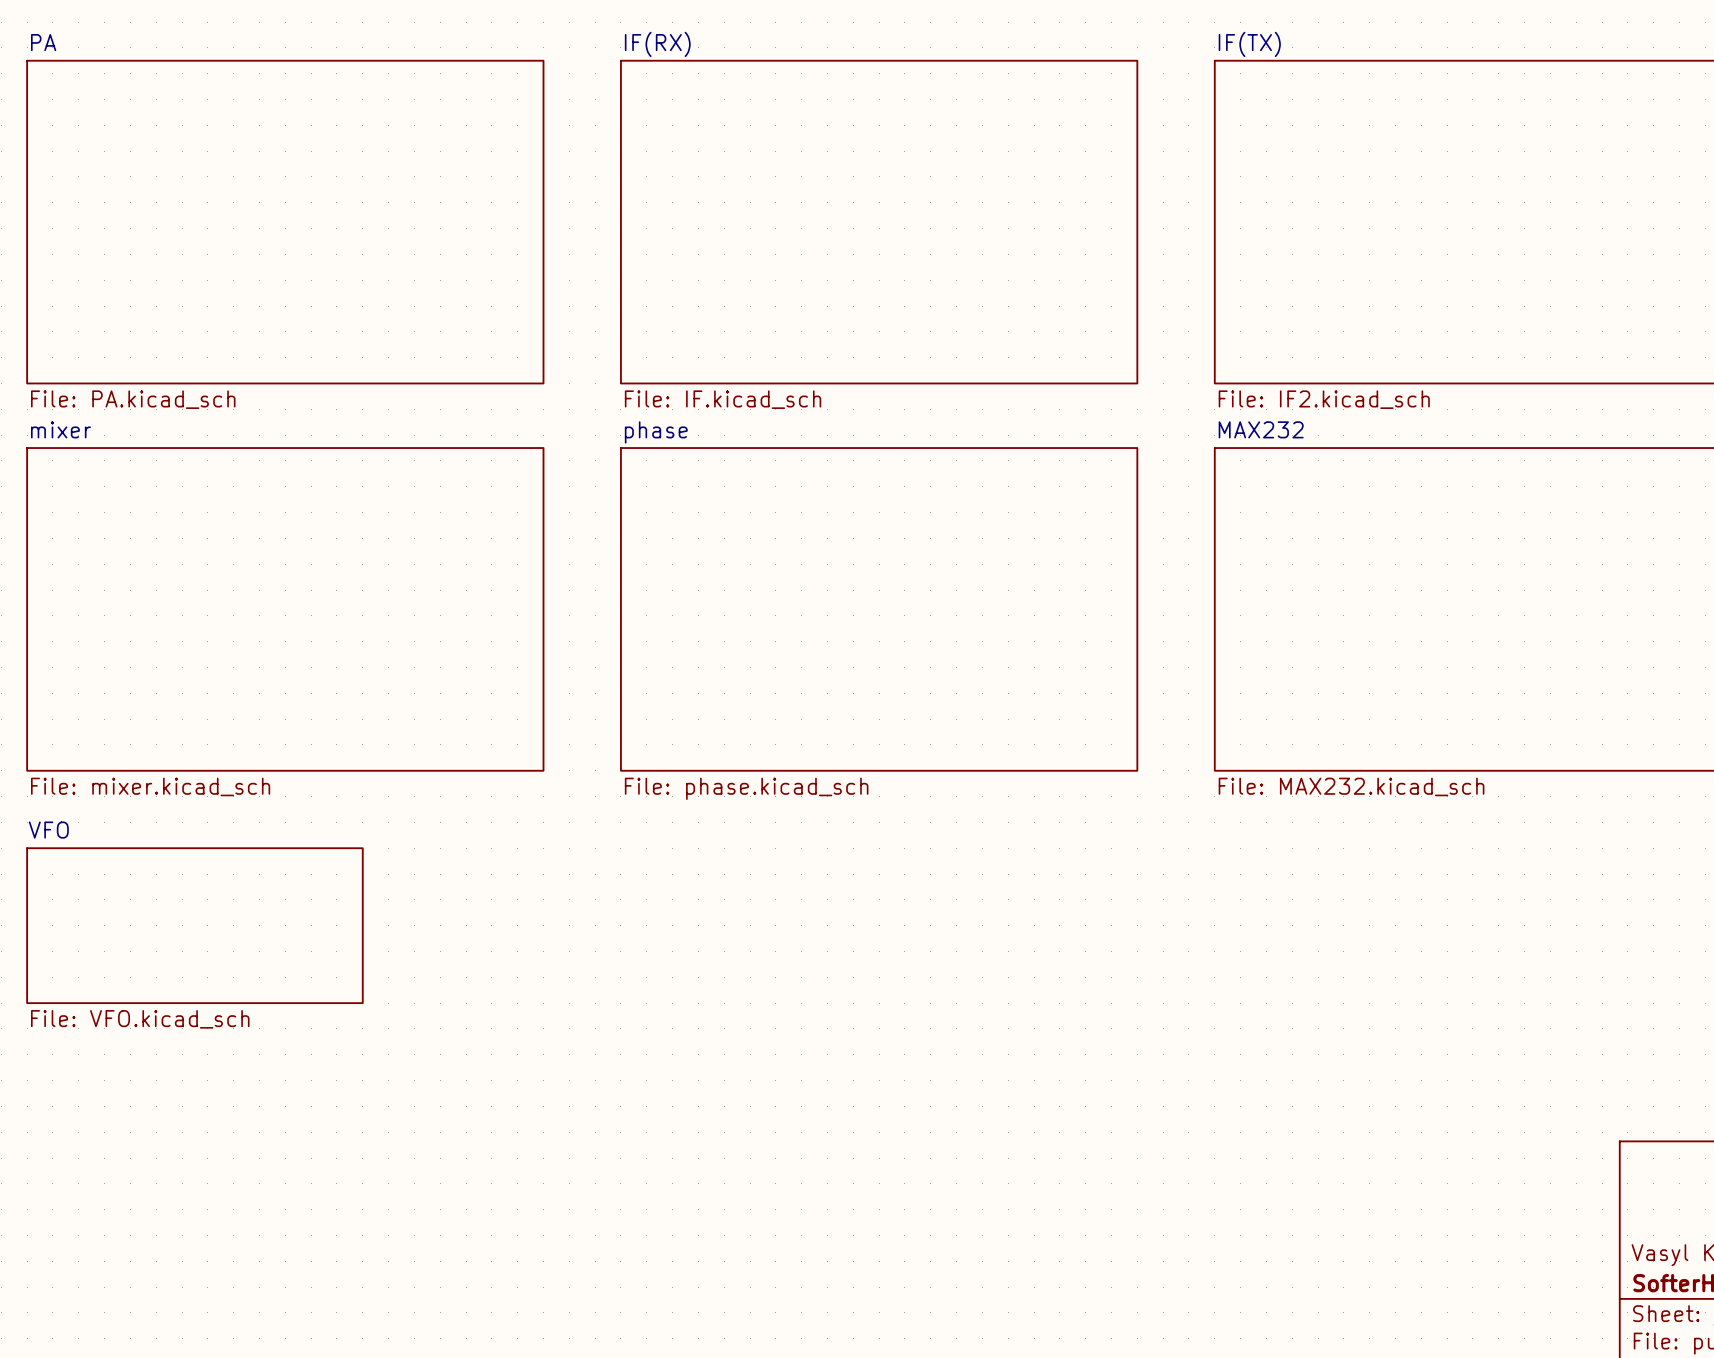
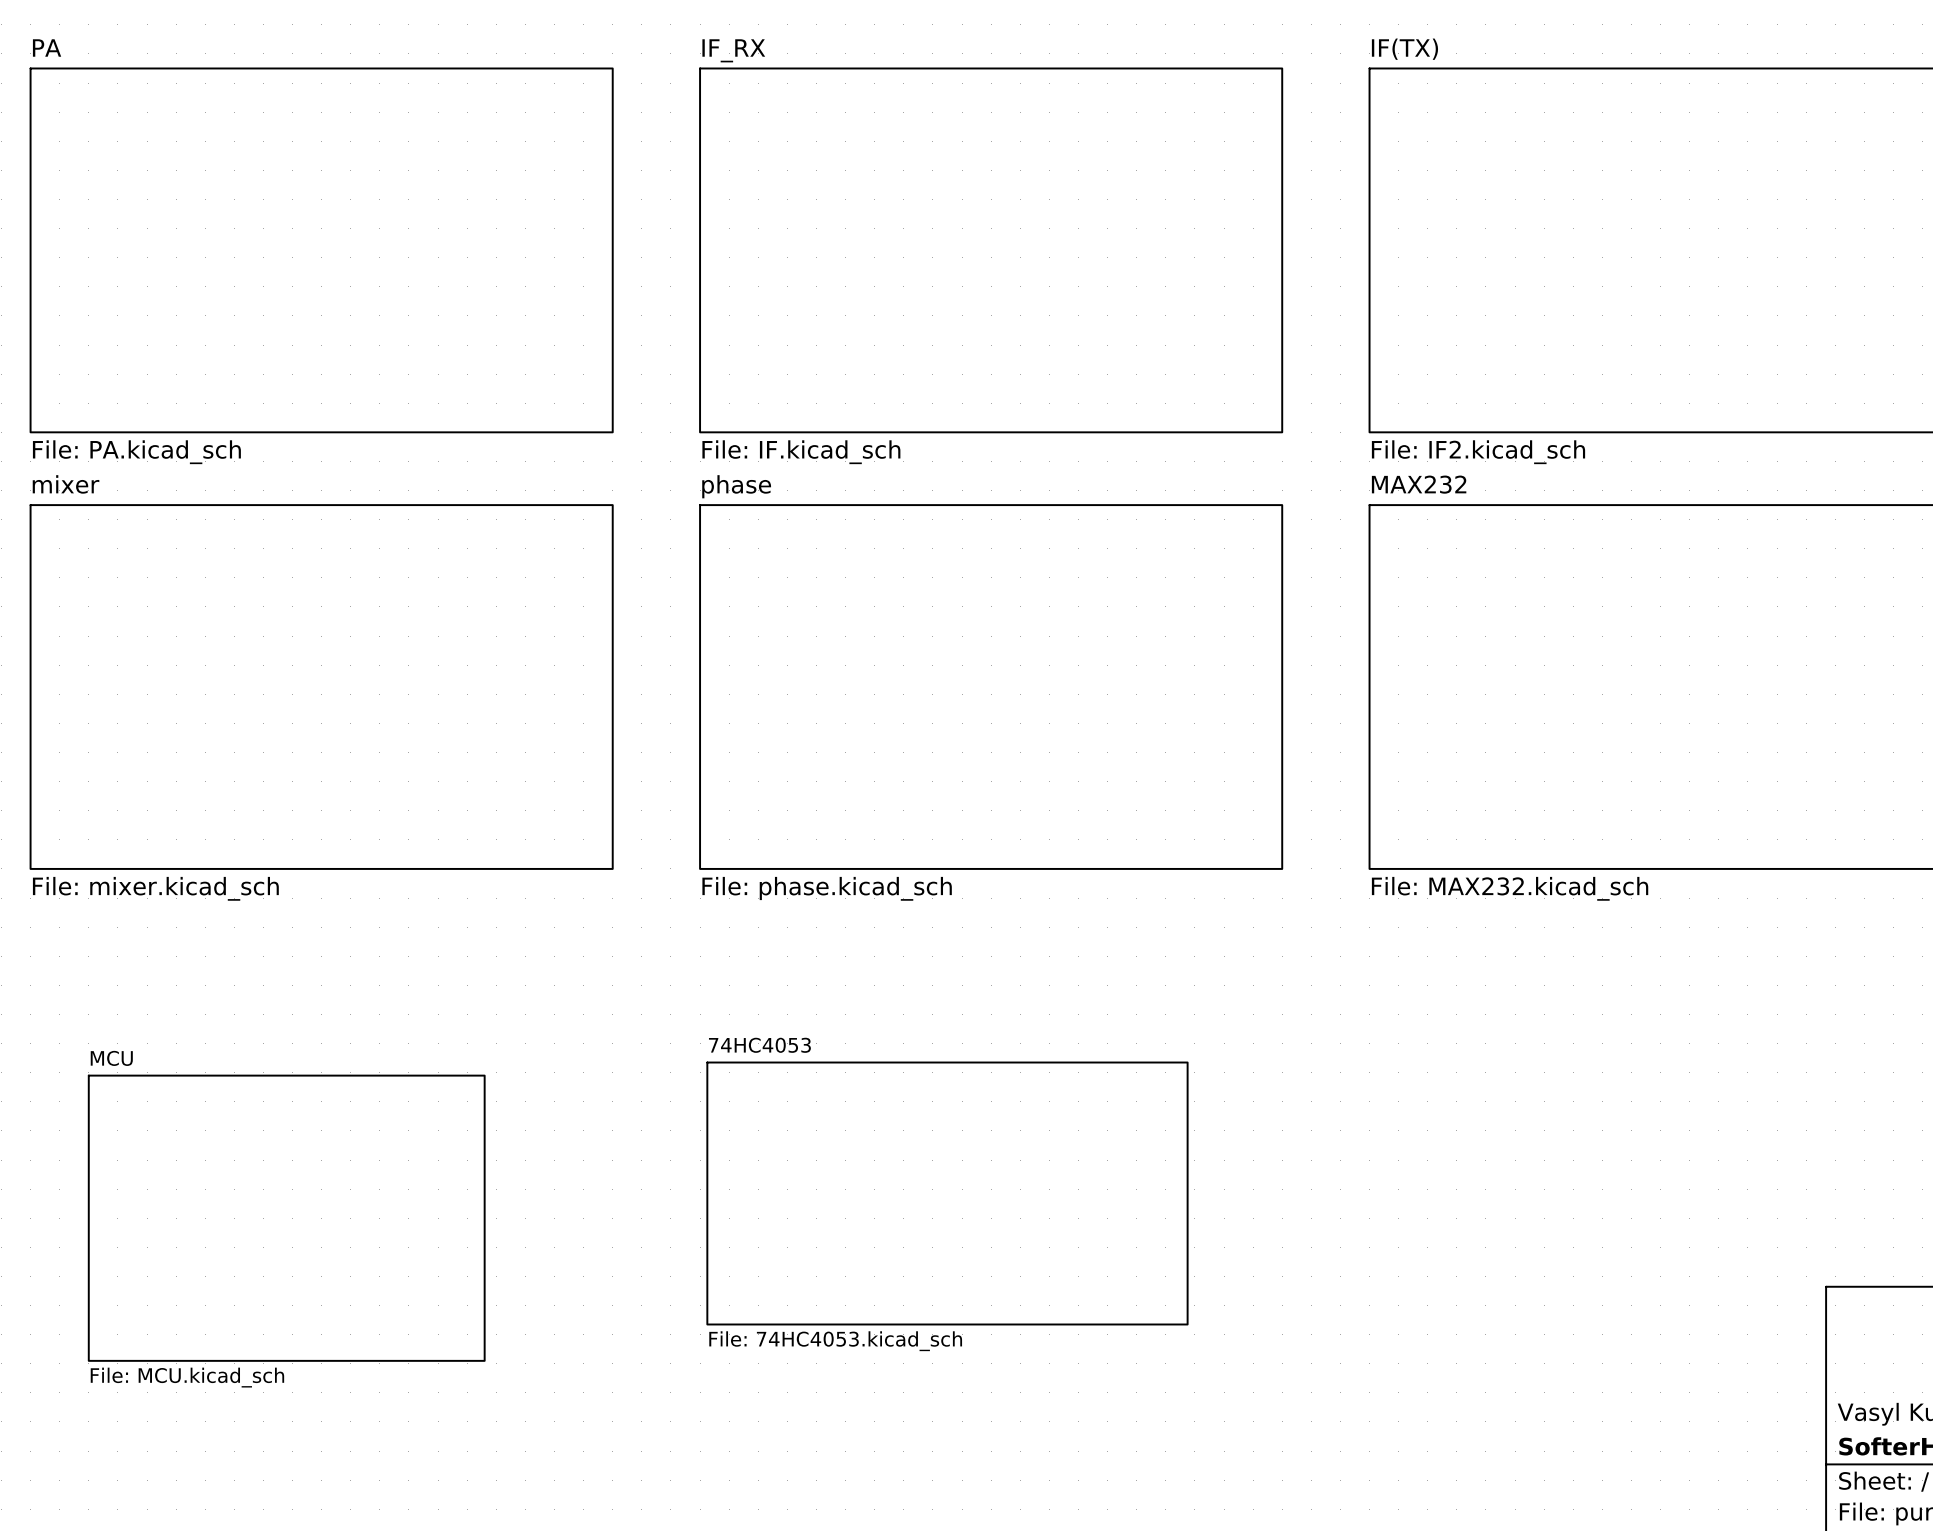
sheet IF(RX) name: IF(RX) (657, 44) -> IF_RX (733, 50)
sheet VFO: File: VFO.kicad_sch (194, 925) -> none
sheet 74HC4053: none -> File: 74HC4053.kicad_sch (947, 1193)
sheet MCU: none -> File: MCU.kicad_sch (286, 1218)

